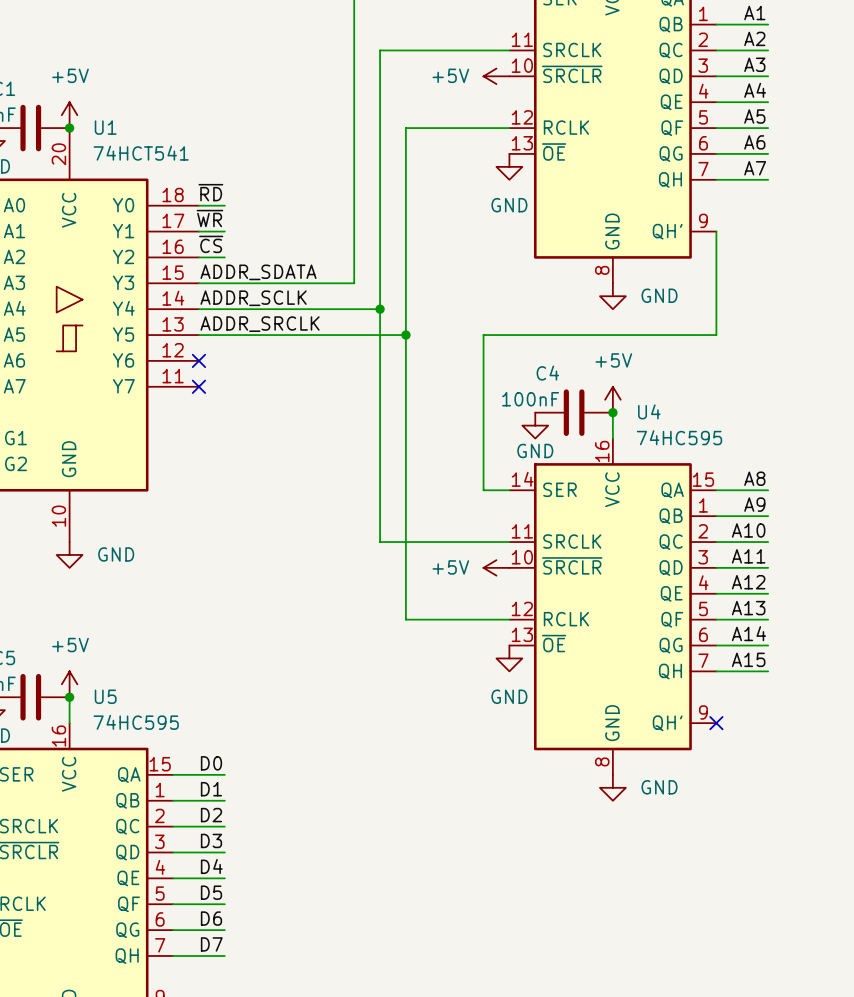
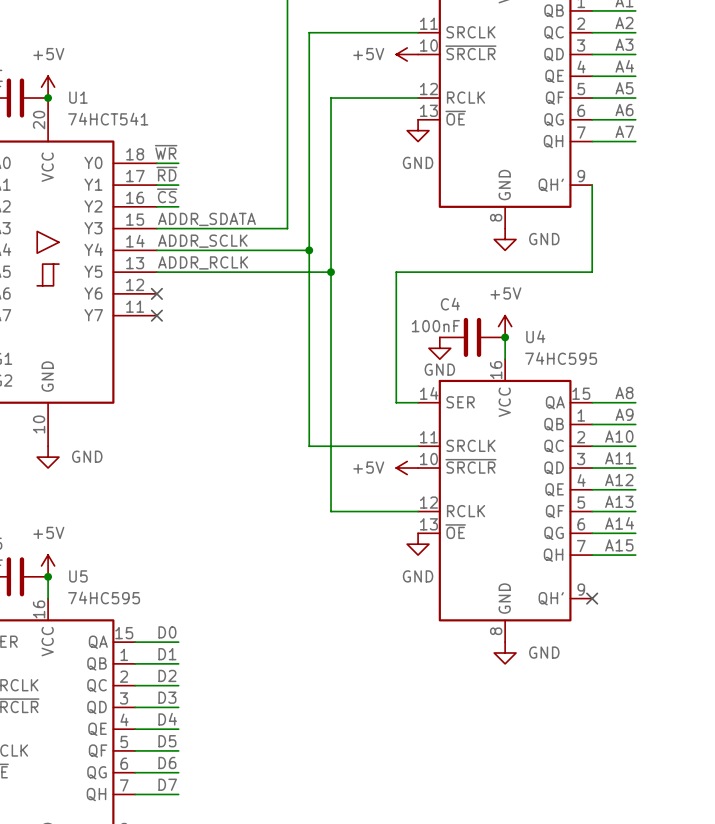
label: ~{RD} (210, 192) -> ~{WR} (166, 152)
label: ~{WR} (209, 218) -> ~{RD} (166, 174)
label: ADDR_SRCLK (260, 324) -> ADDR_RCLK (203, 262)

